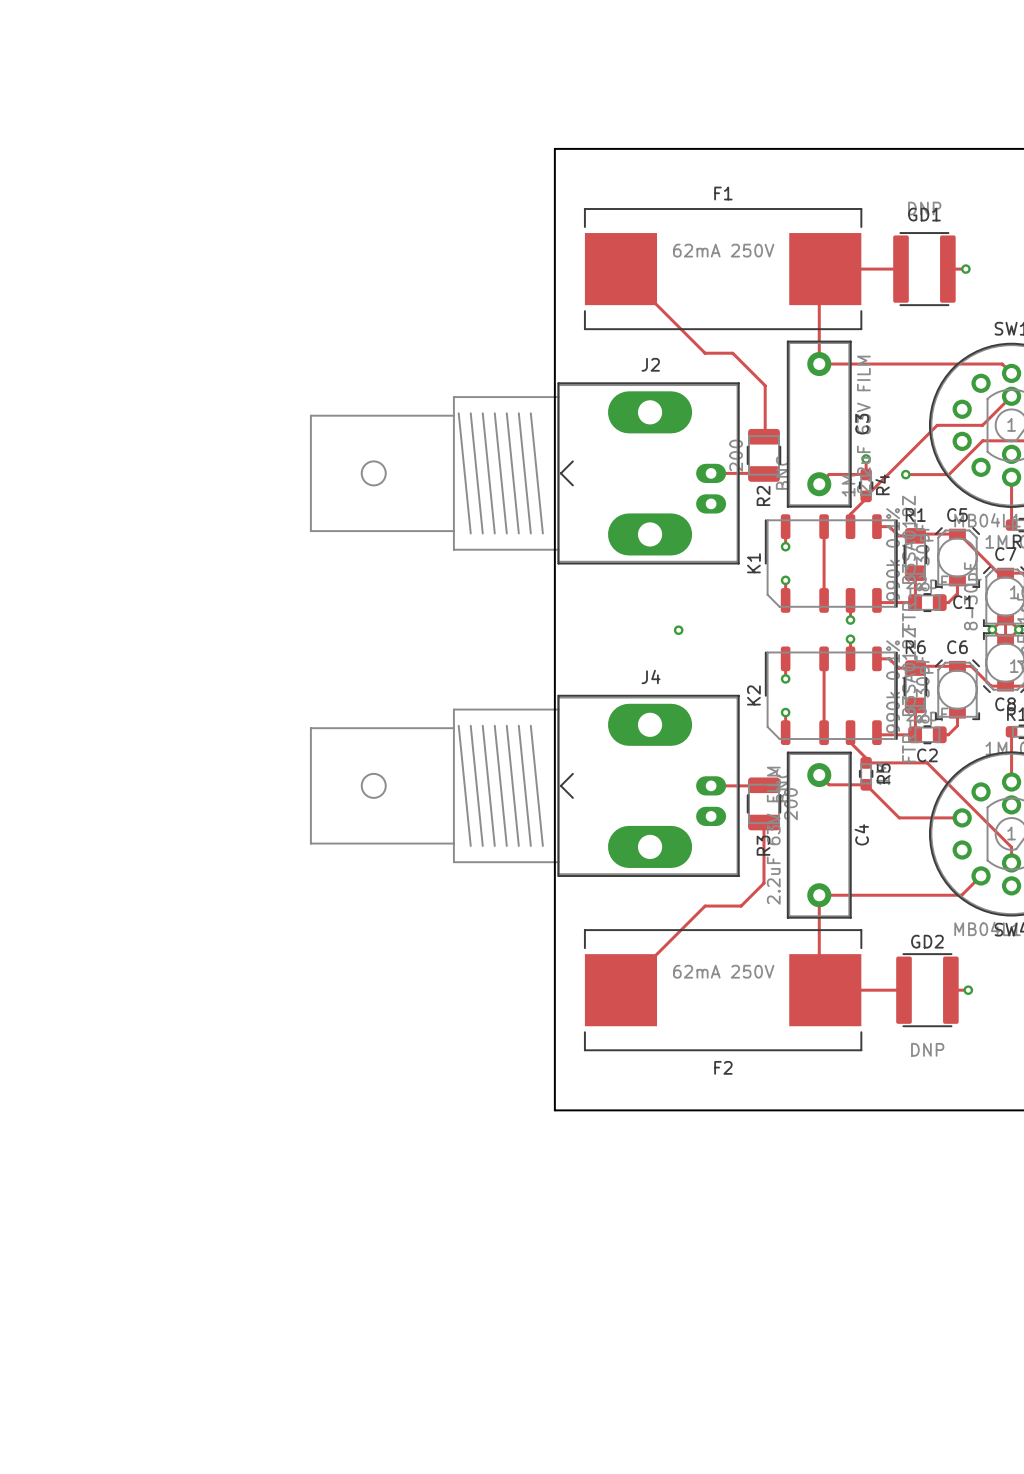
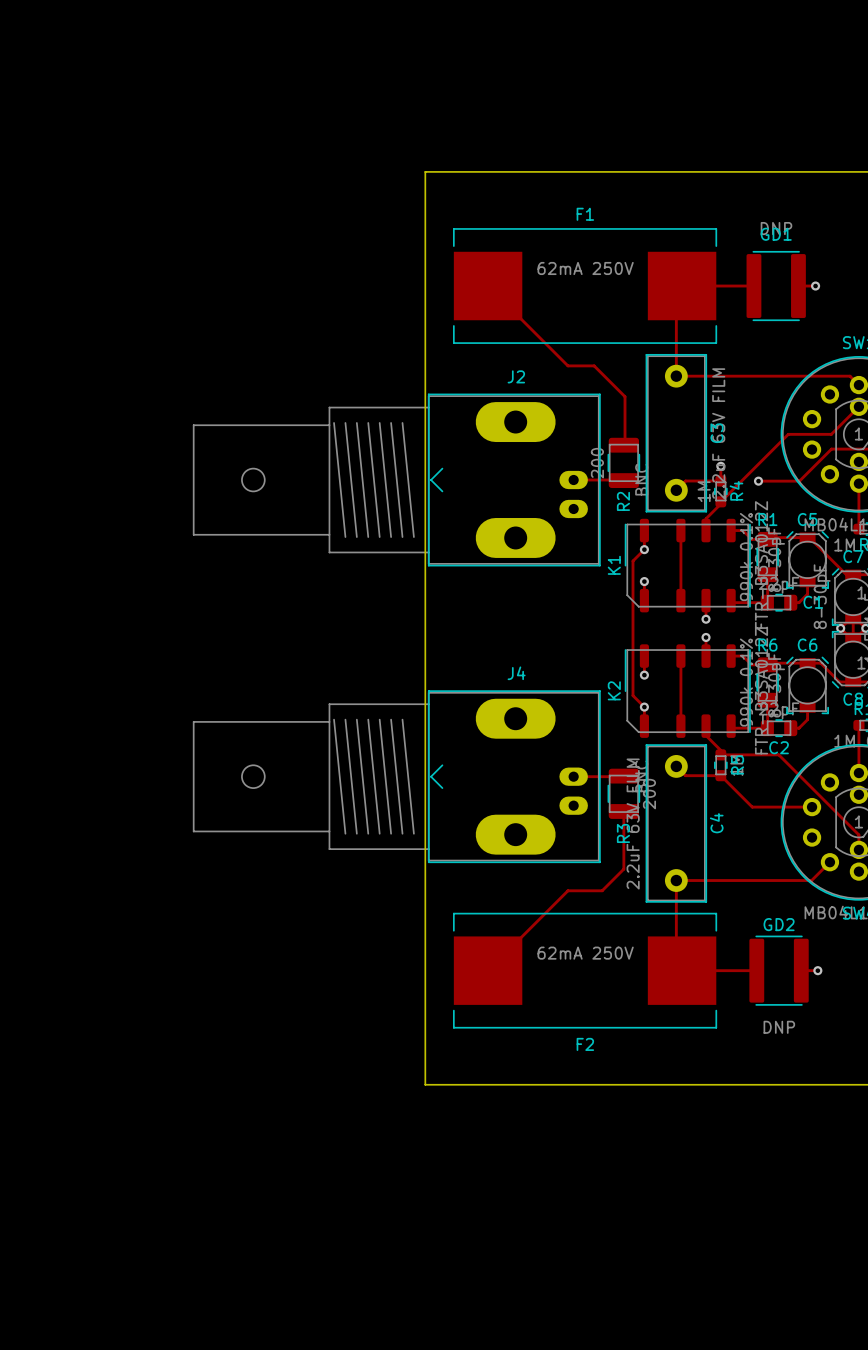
track: none -> (644, 549) (632, 561) (632, 695) (644, 707)
via: (678, 630) -> none

